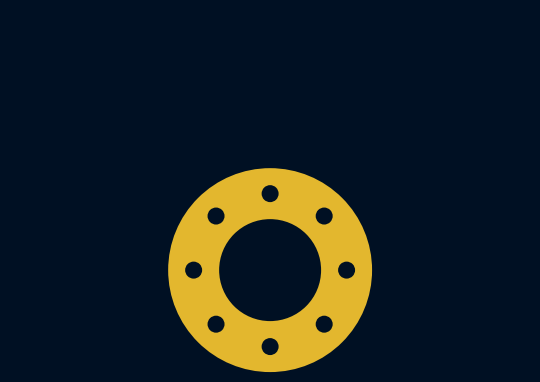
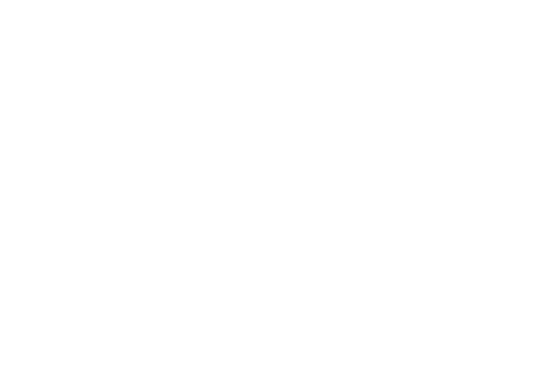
part: (270, 270) -> none

